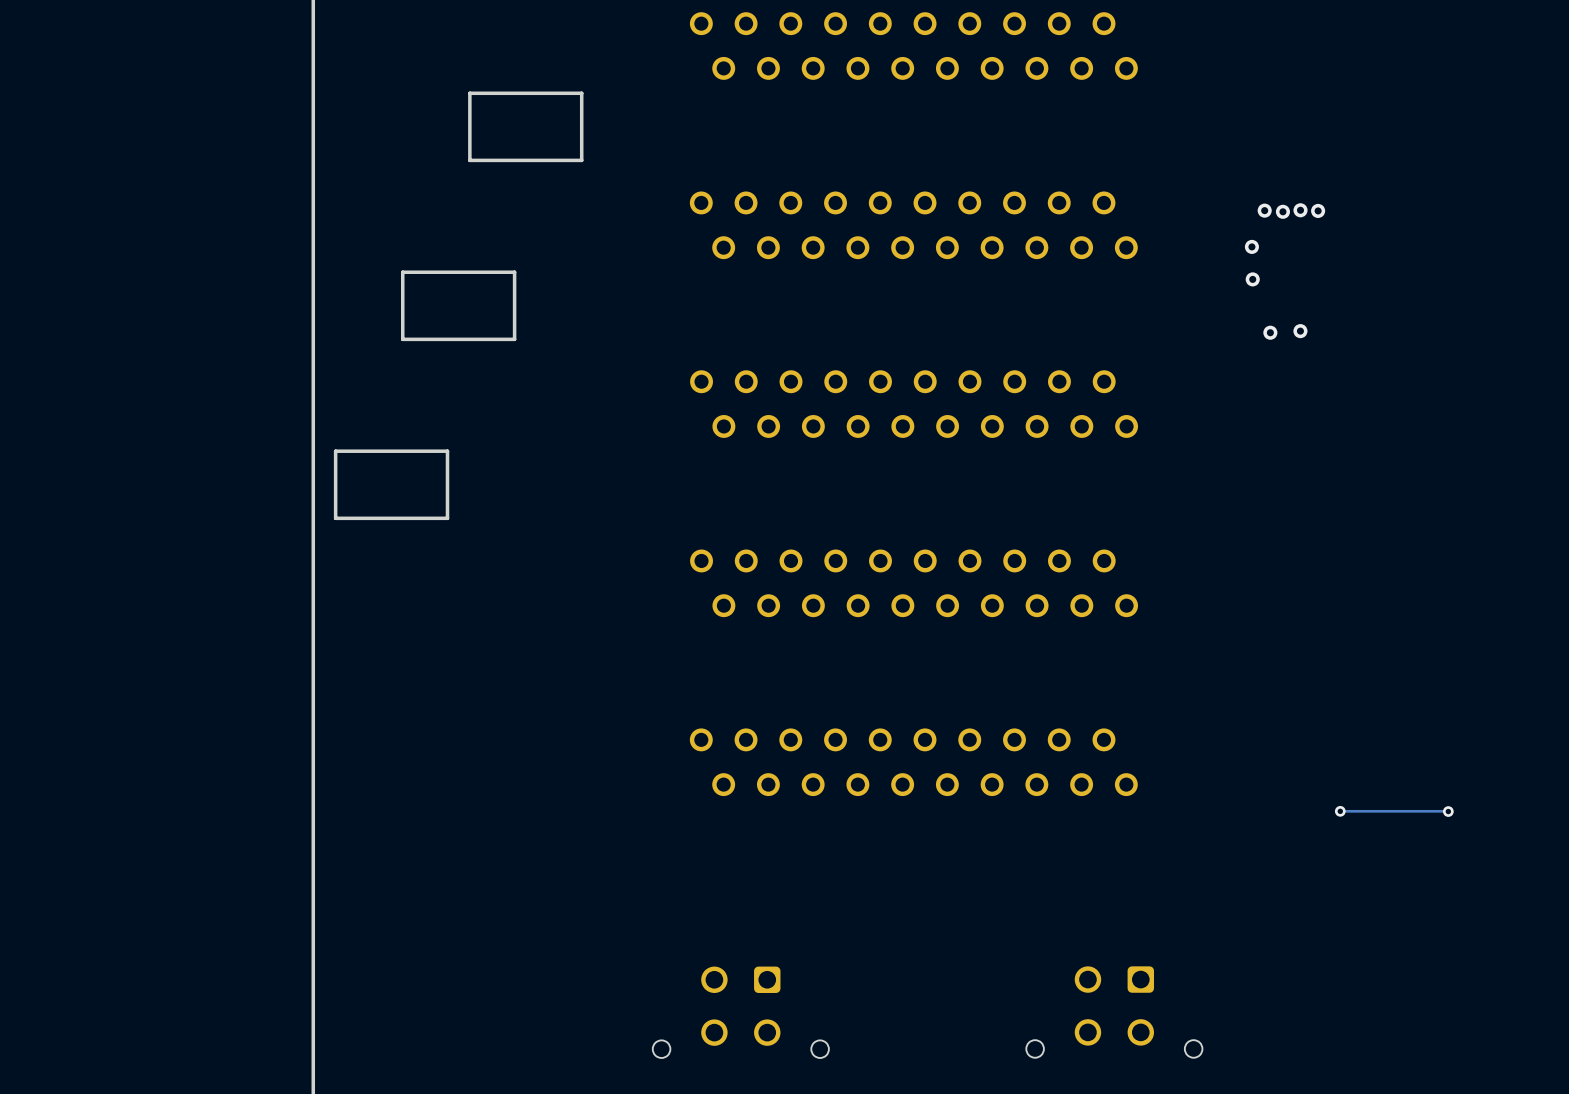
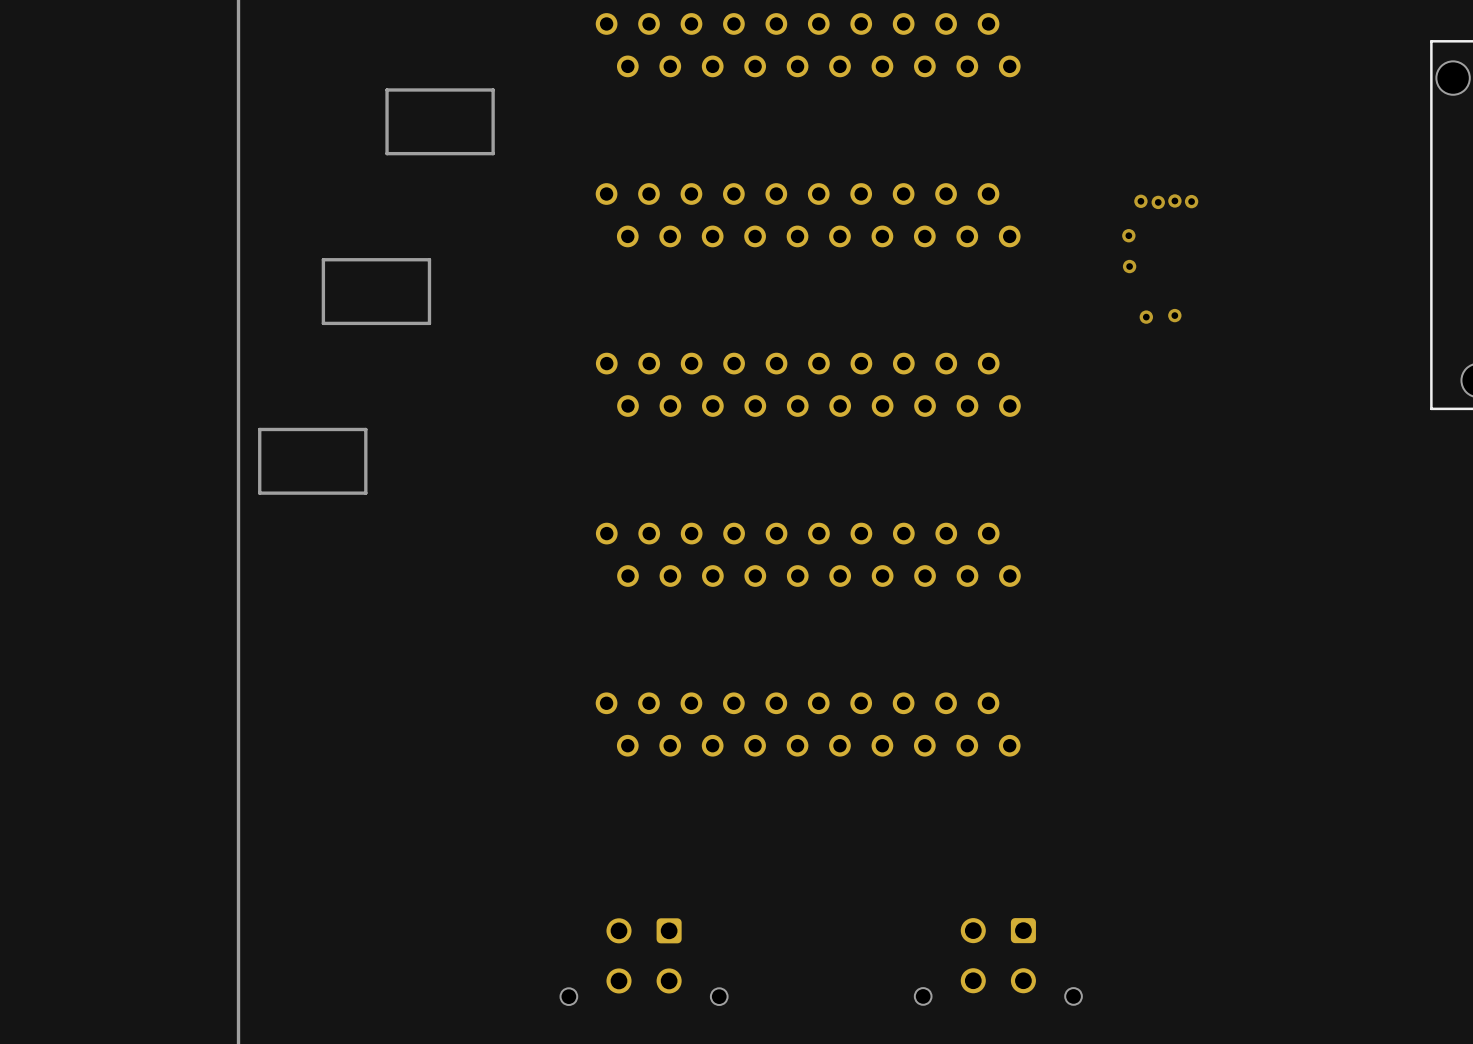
via: (1340, 811) -> none
track: (1448, 811) (1340, 811) -> none
via: (1448, 811) -> none

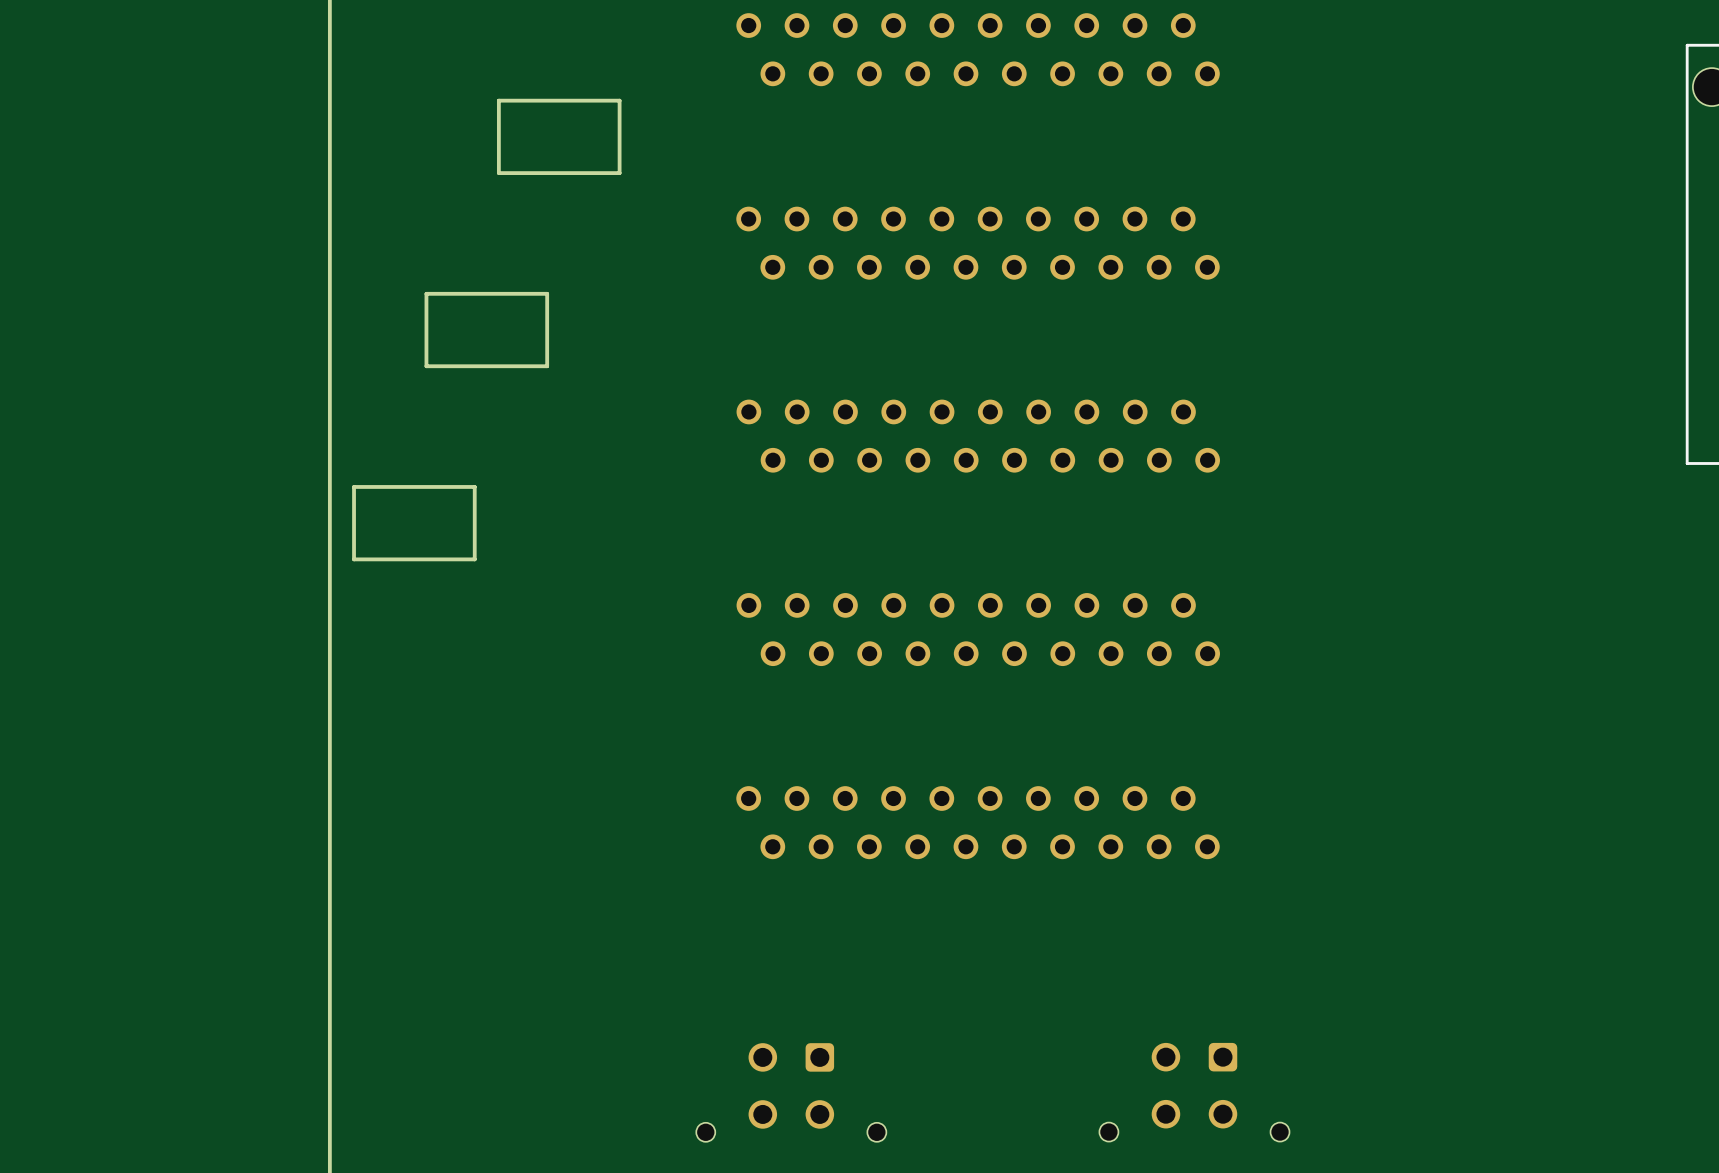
via: (1174, 200) -> none
via: (1140, 201) -> none
via: (1191, 201) -> none
via: (1158, 202) -> none
via: (1128, 235) -> none
via: (1129, 266) -> none
via: (1174, 315) -> none
via: (1146, 317) -> none

